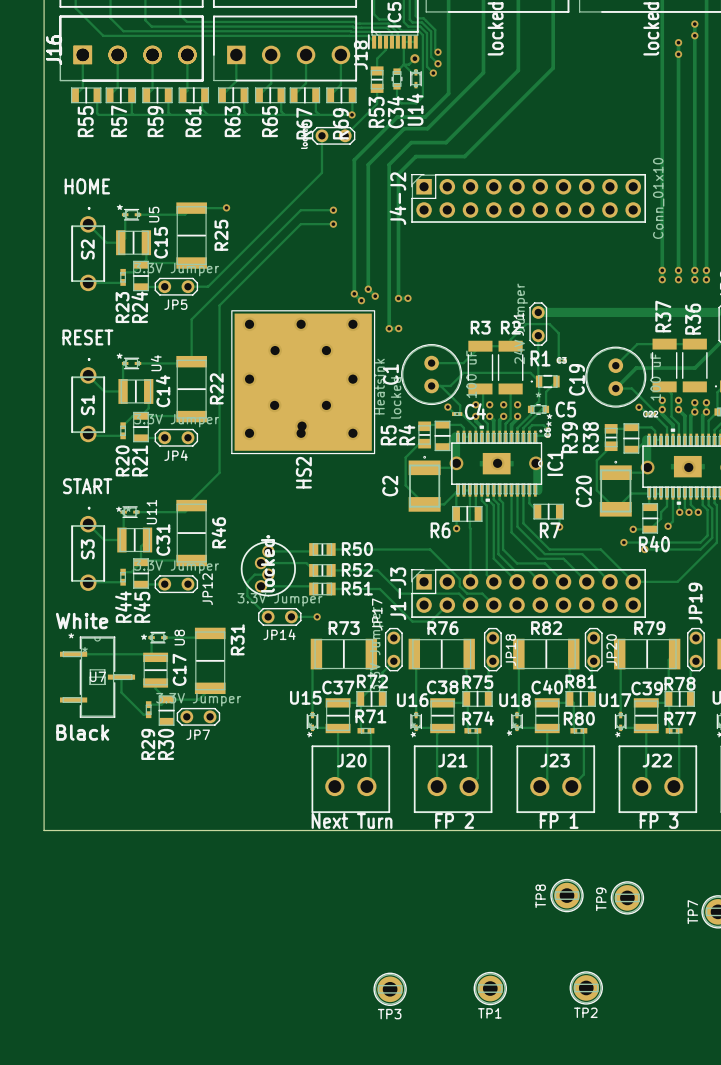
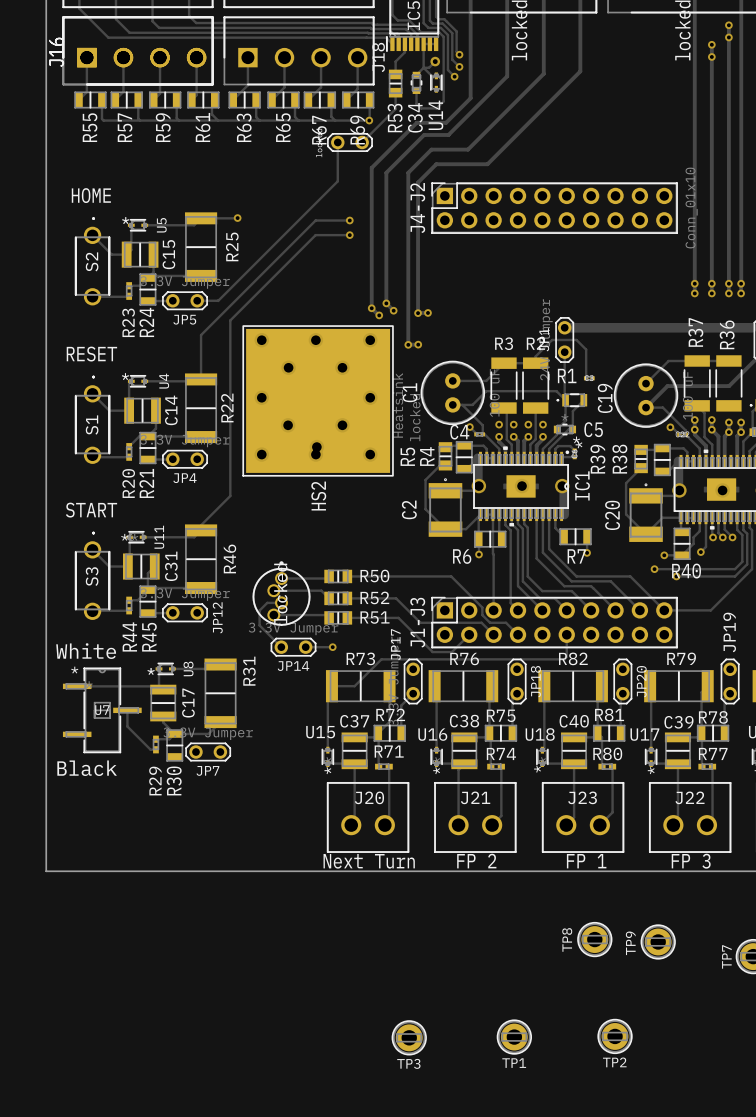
C4 name position: C4 (475, 411) -> C4 (459, 432)
track: none -> (566, 634) (566, 656) (564, 659) (381, 659) (354, 686) (331, 686)

